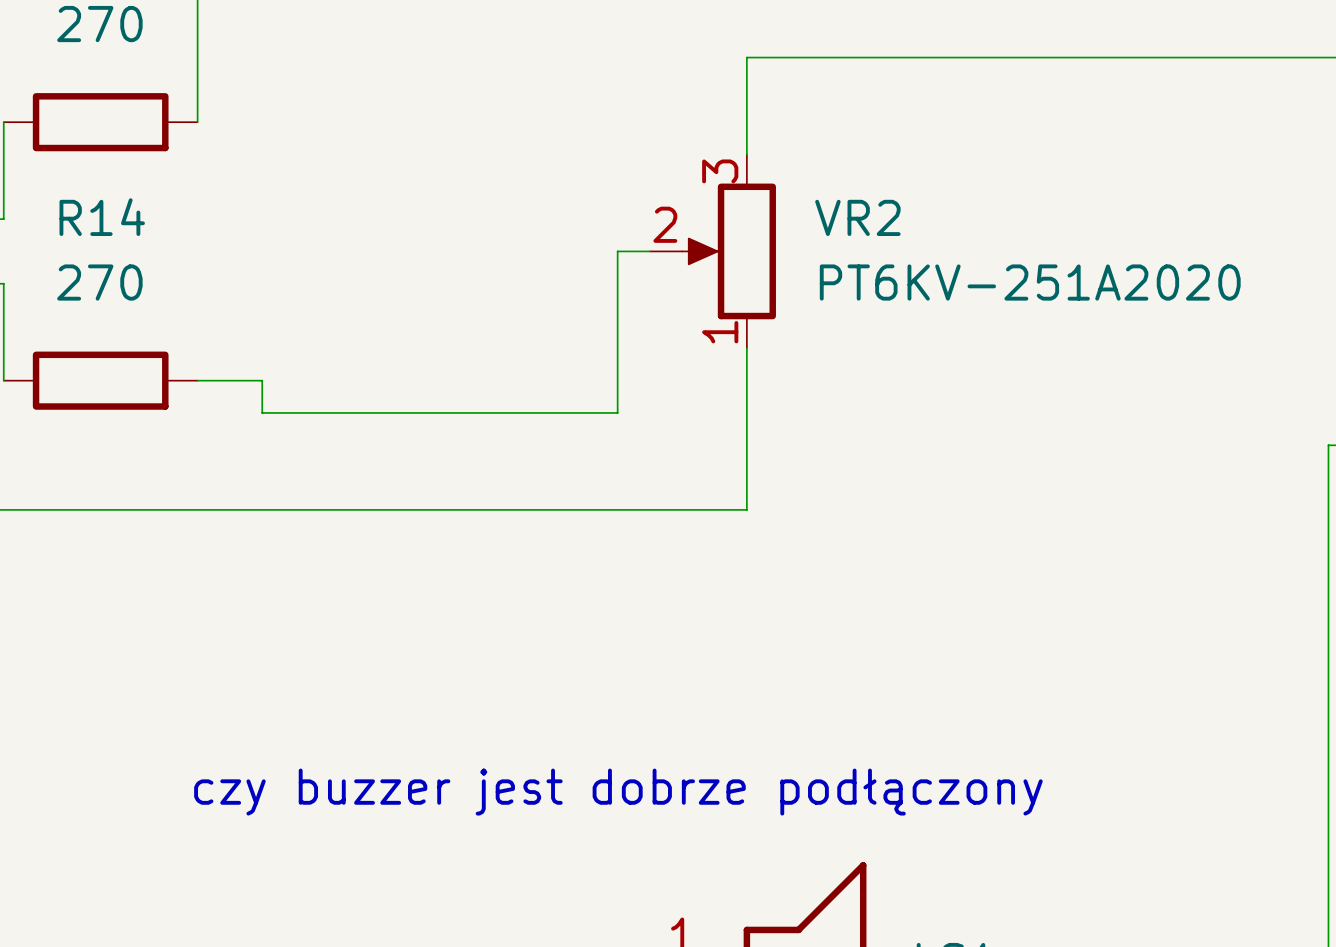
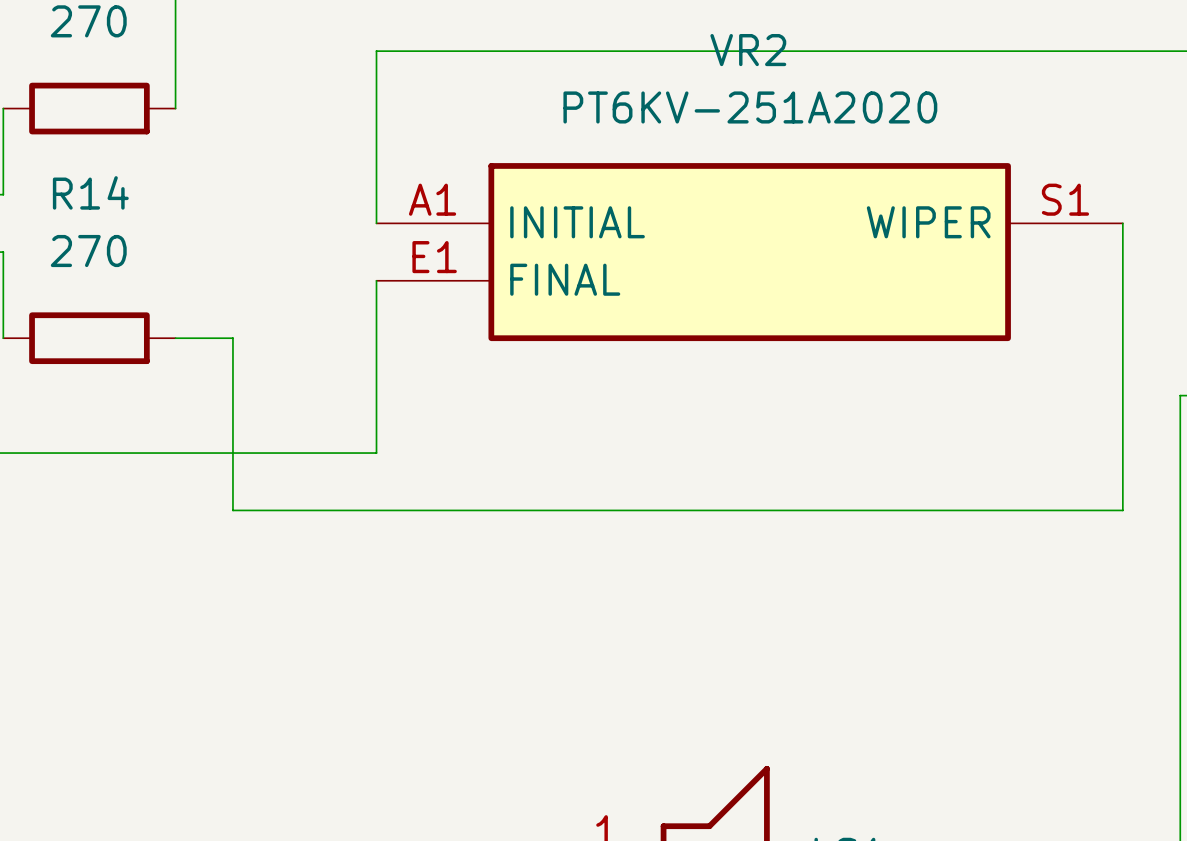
wire: (746, 57) (746, 154) -> (663, 51) (376, 51) (376, 223)
VR2 symbol: [649, 154, 776, 349] -> [376, 163, 1123, 342]
VR2 name position: VR2 (857, 217) -> VR2 (748, 50)
wire: (649, 251) (617, 251) (617, 412) (262, 412) -> (1122, 223) (1122, 510) (232, 510) (232, 366)
VR2 value position: PT6KV-251A2020 (1030, 282) -> PT6KV-251A2020 (750, 107)
wire: (746, 348) (746, 509) (423, 509) -> (376, 280) (376, 453)
text: czy buzzer jest dobrze podłączony (618, 792) -> none

